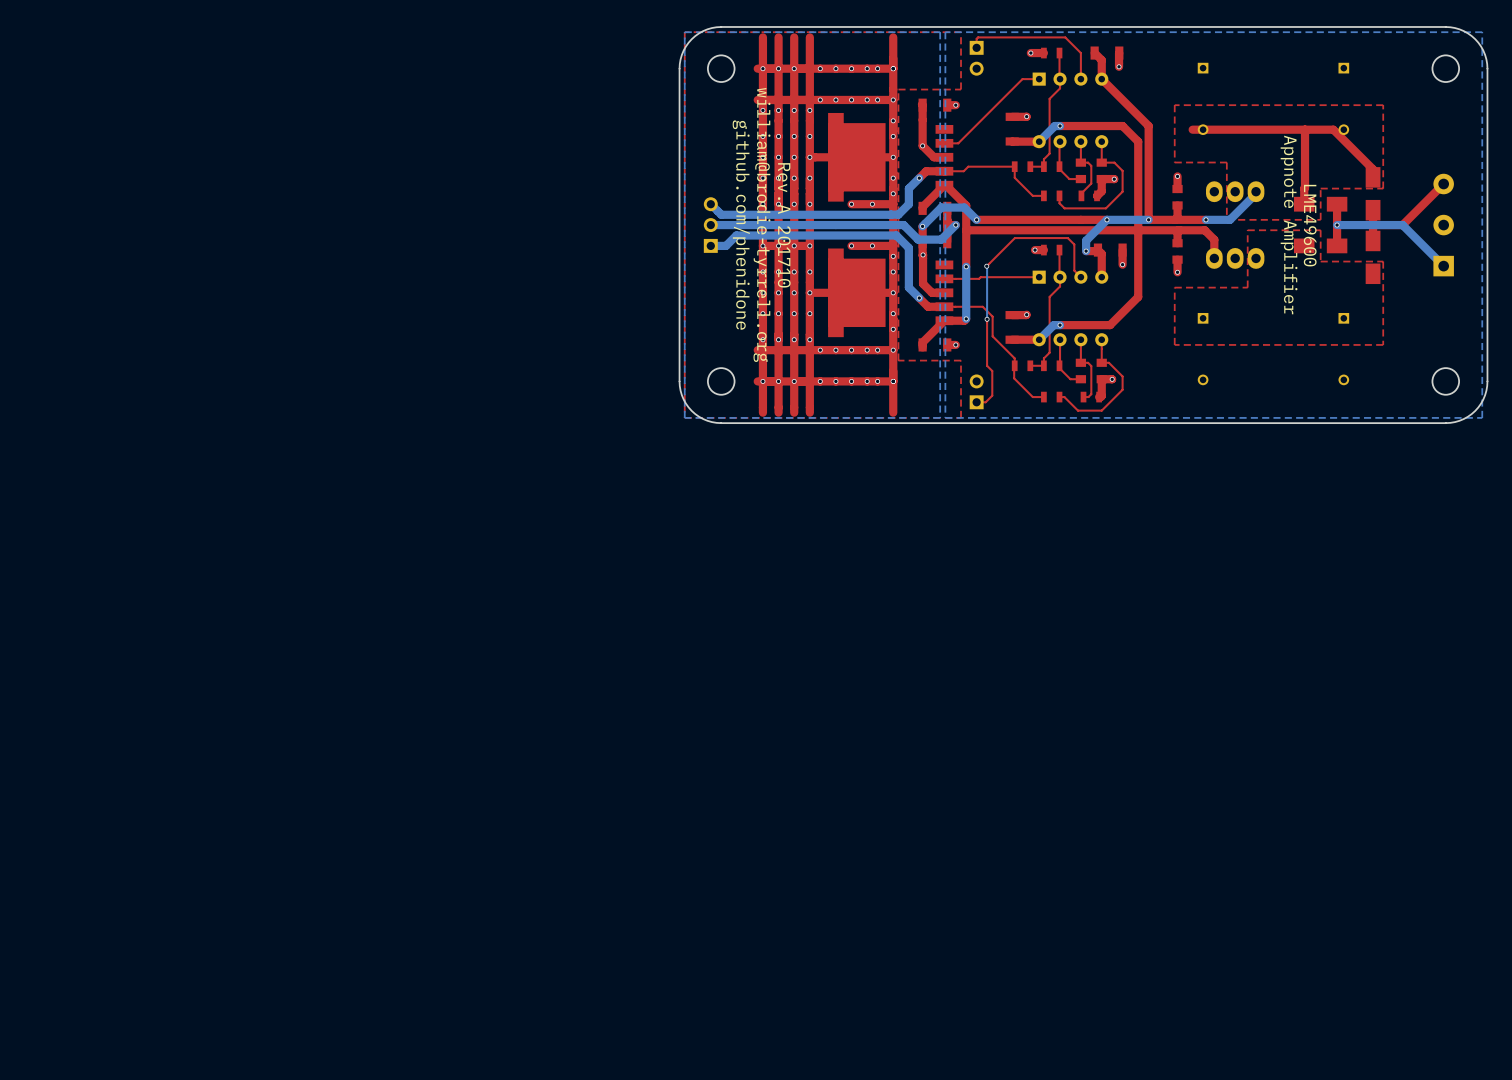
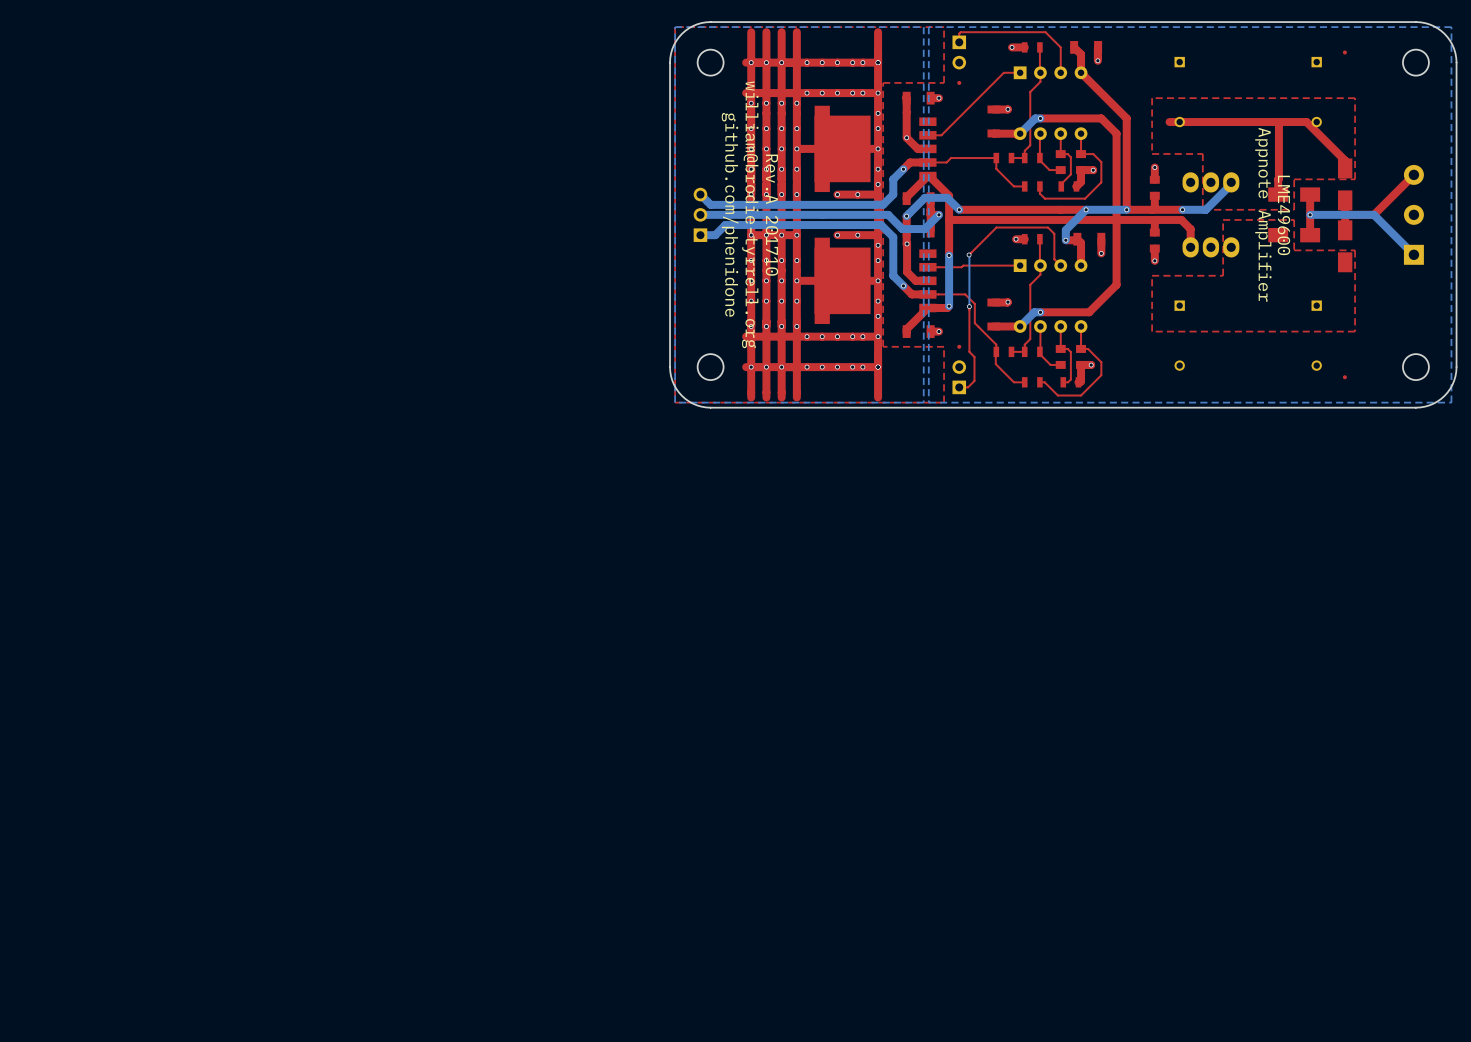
part: none -> (1344, 52)
part: none -> (959, 82)
part: none -> (959, 346)
part: none -> (1344, 377)

